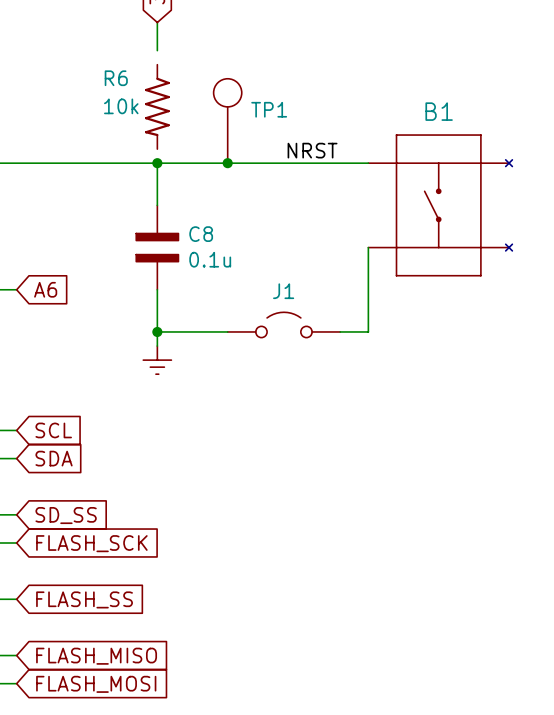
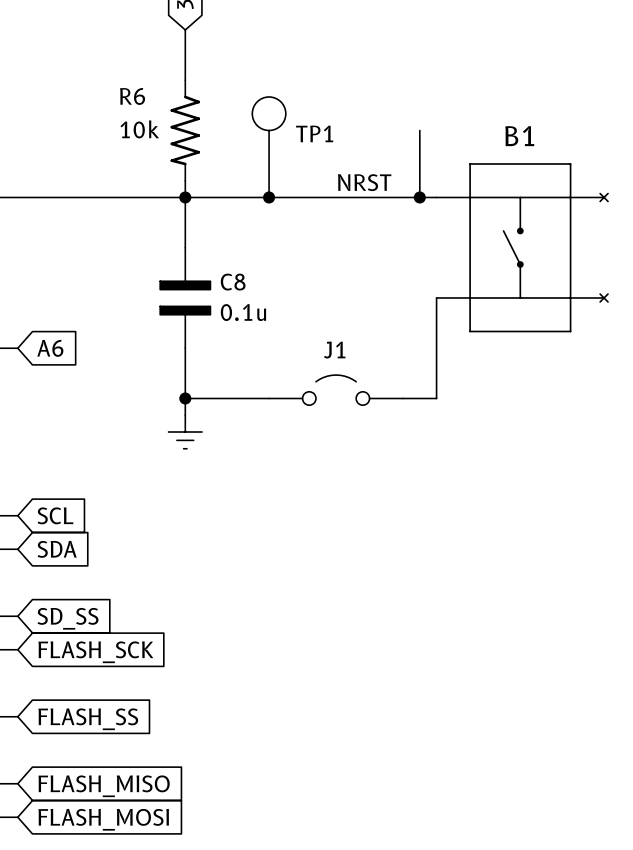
wire: none -> (185, 63) (185, 80)
wire: none -> (419, 130) (419, 197)
wire: none -> (185, 180) (185, 197)
junction: none -> (419, 197)

